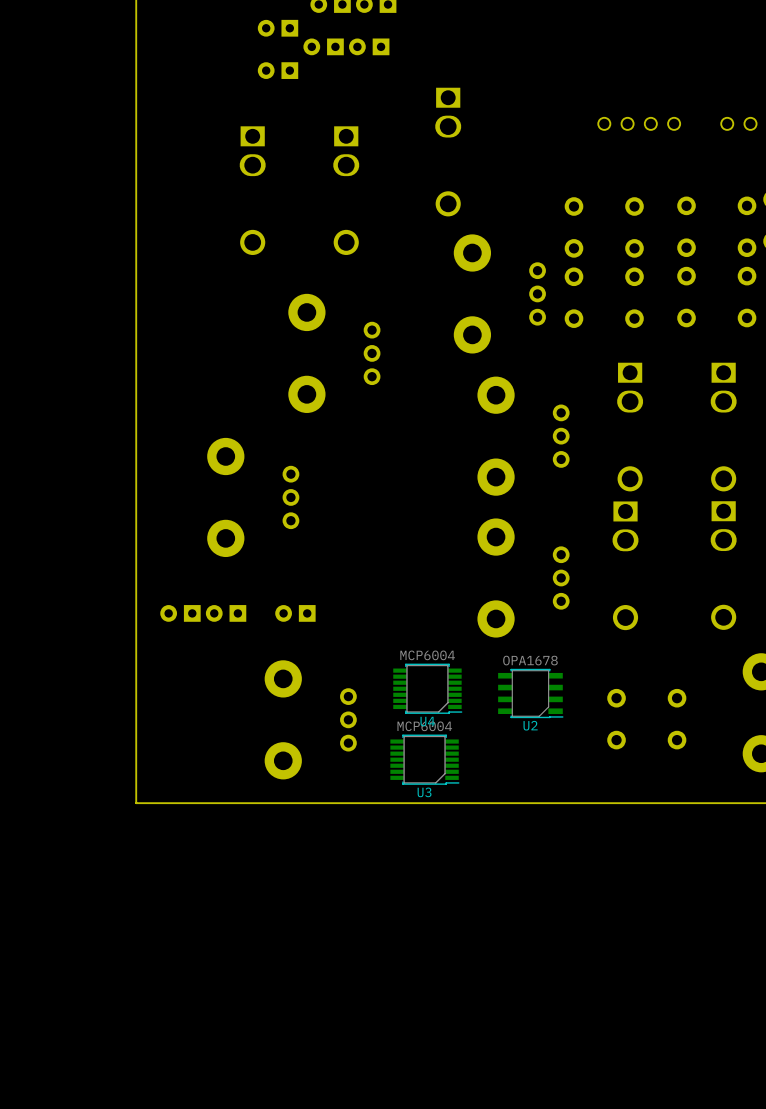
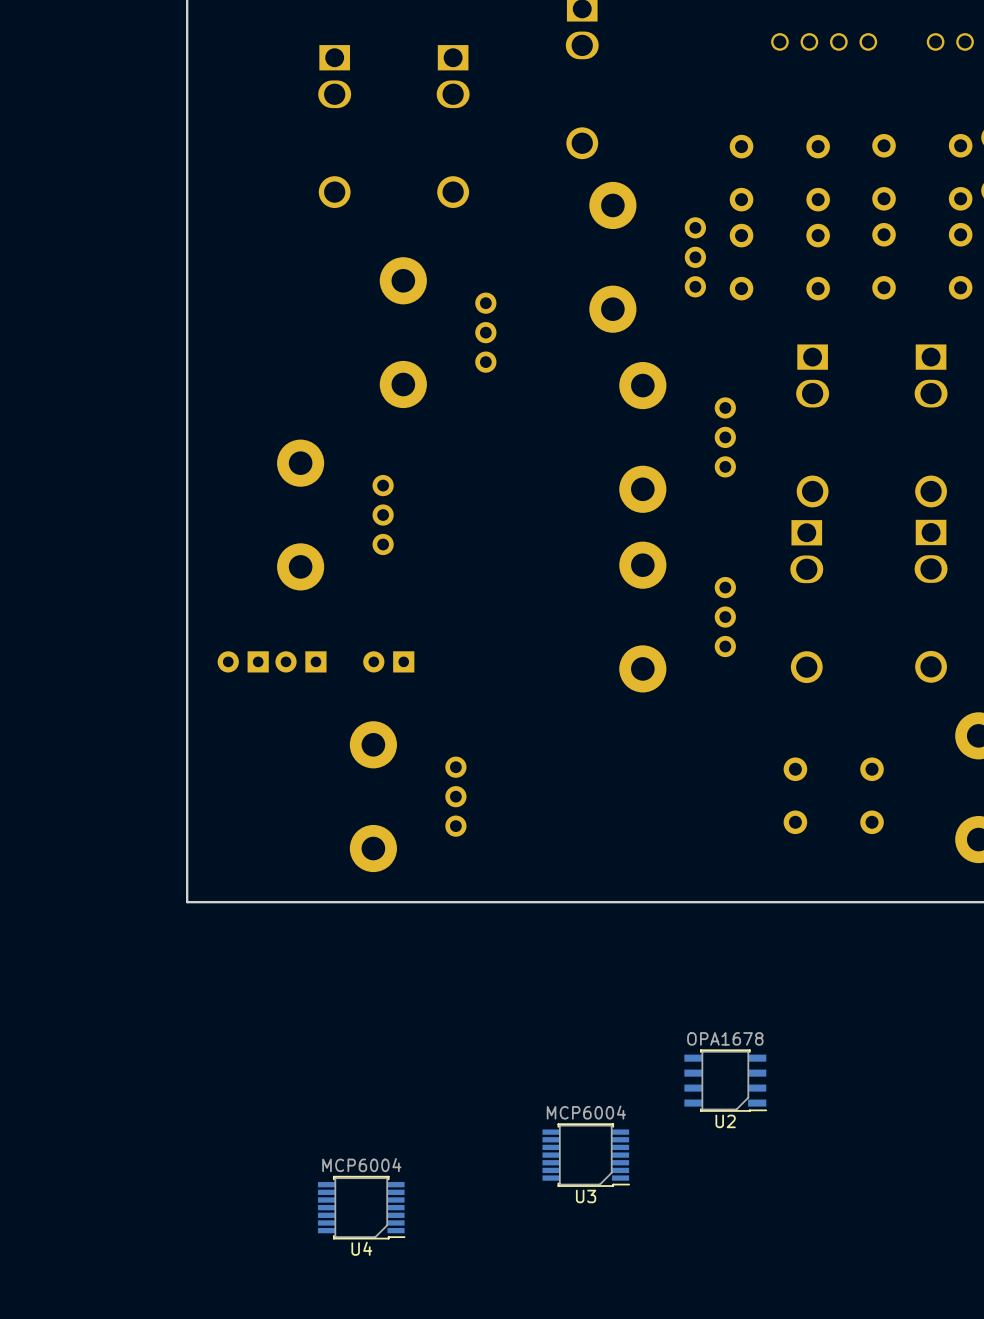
U4 position: (427, 688) -> (361, 1207)
U2 position: (530, 693) -> (725, 1080)
U3 position: (424, 759) -> (586, 1155)

